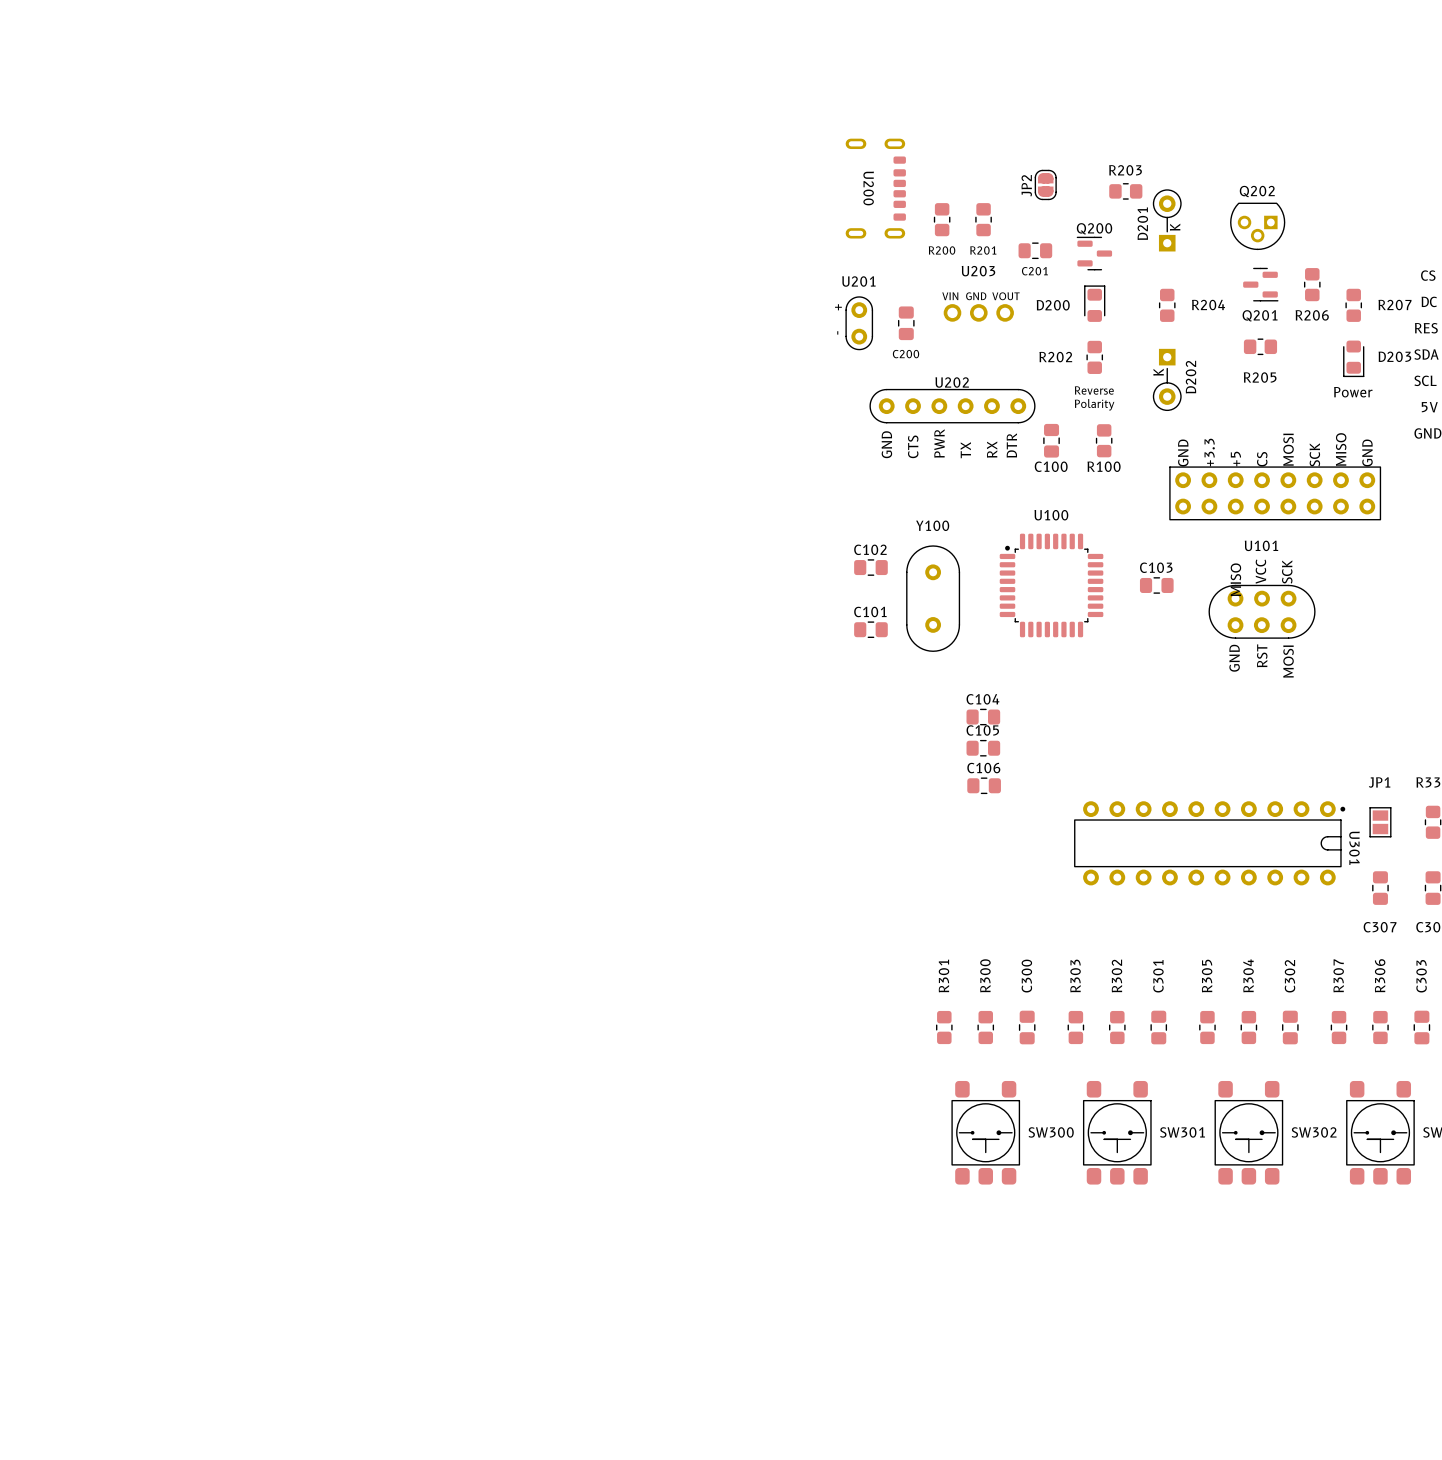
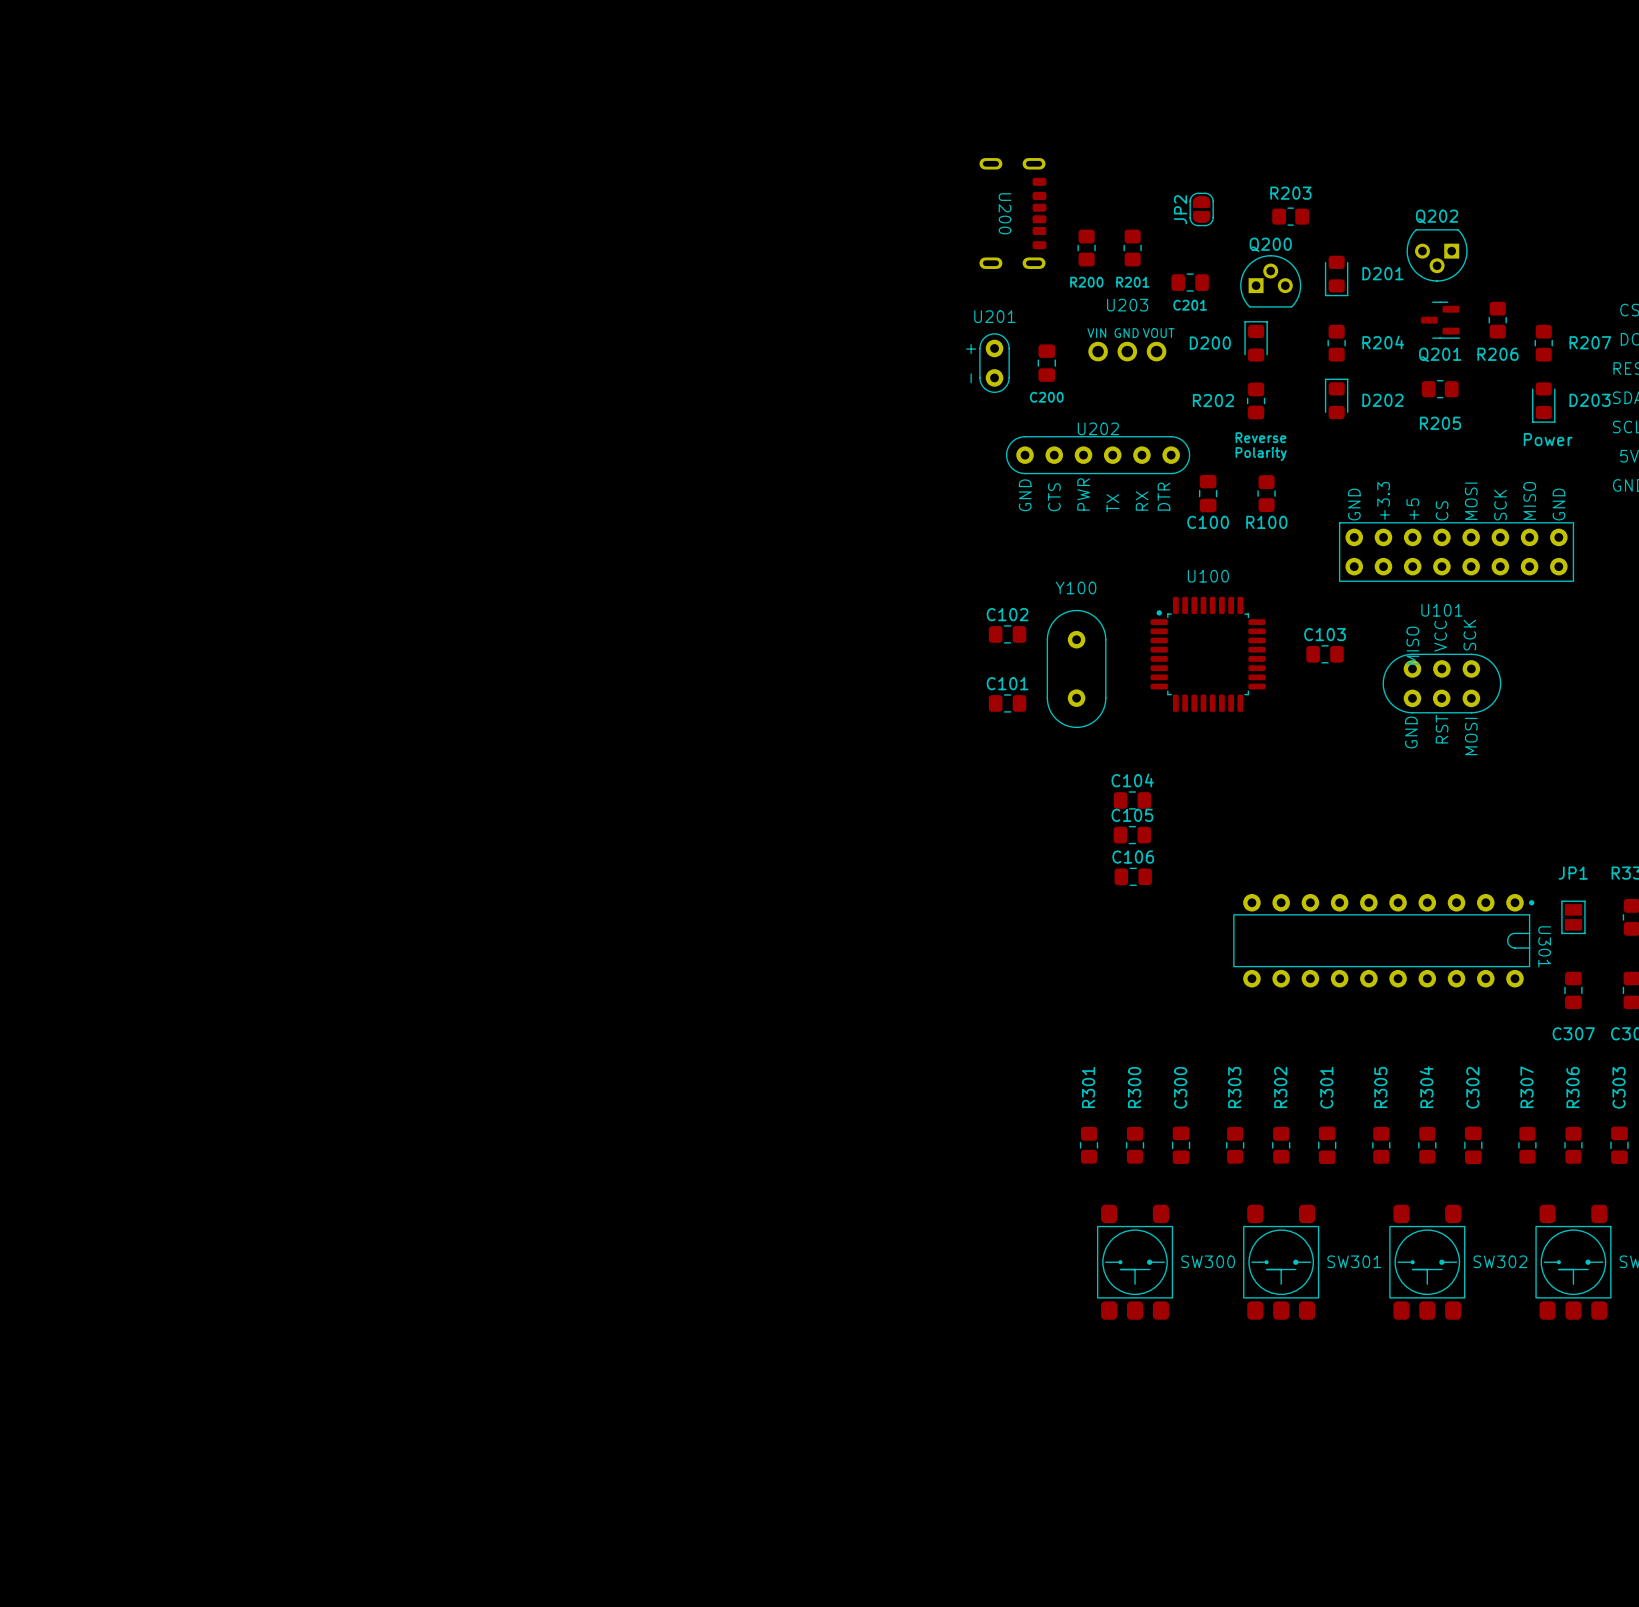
D201 footprint: [1152, 189, 1182, 252] -> [1324, 255, 1349, 297]
D201 name position: D201 (1142, 223) -> D201 (1382, 273)
Q200 footprint: [1076, 236, 1113, 271] -> [1240, 255, 1302, 308]
D202 footprint: [1152, 348, 1182, 411] -> [1324, 378, 1349, 420]

